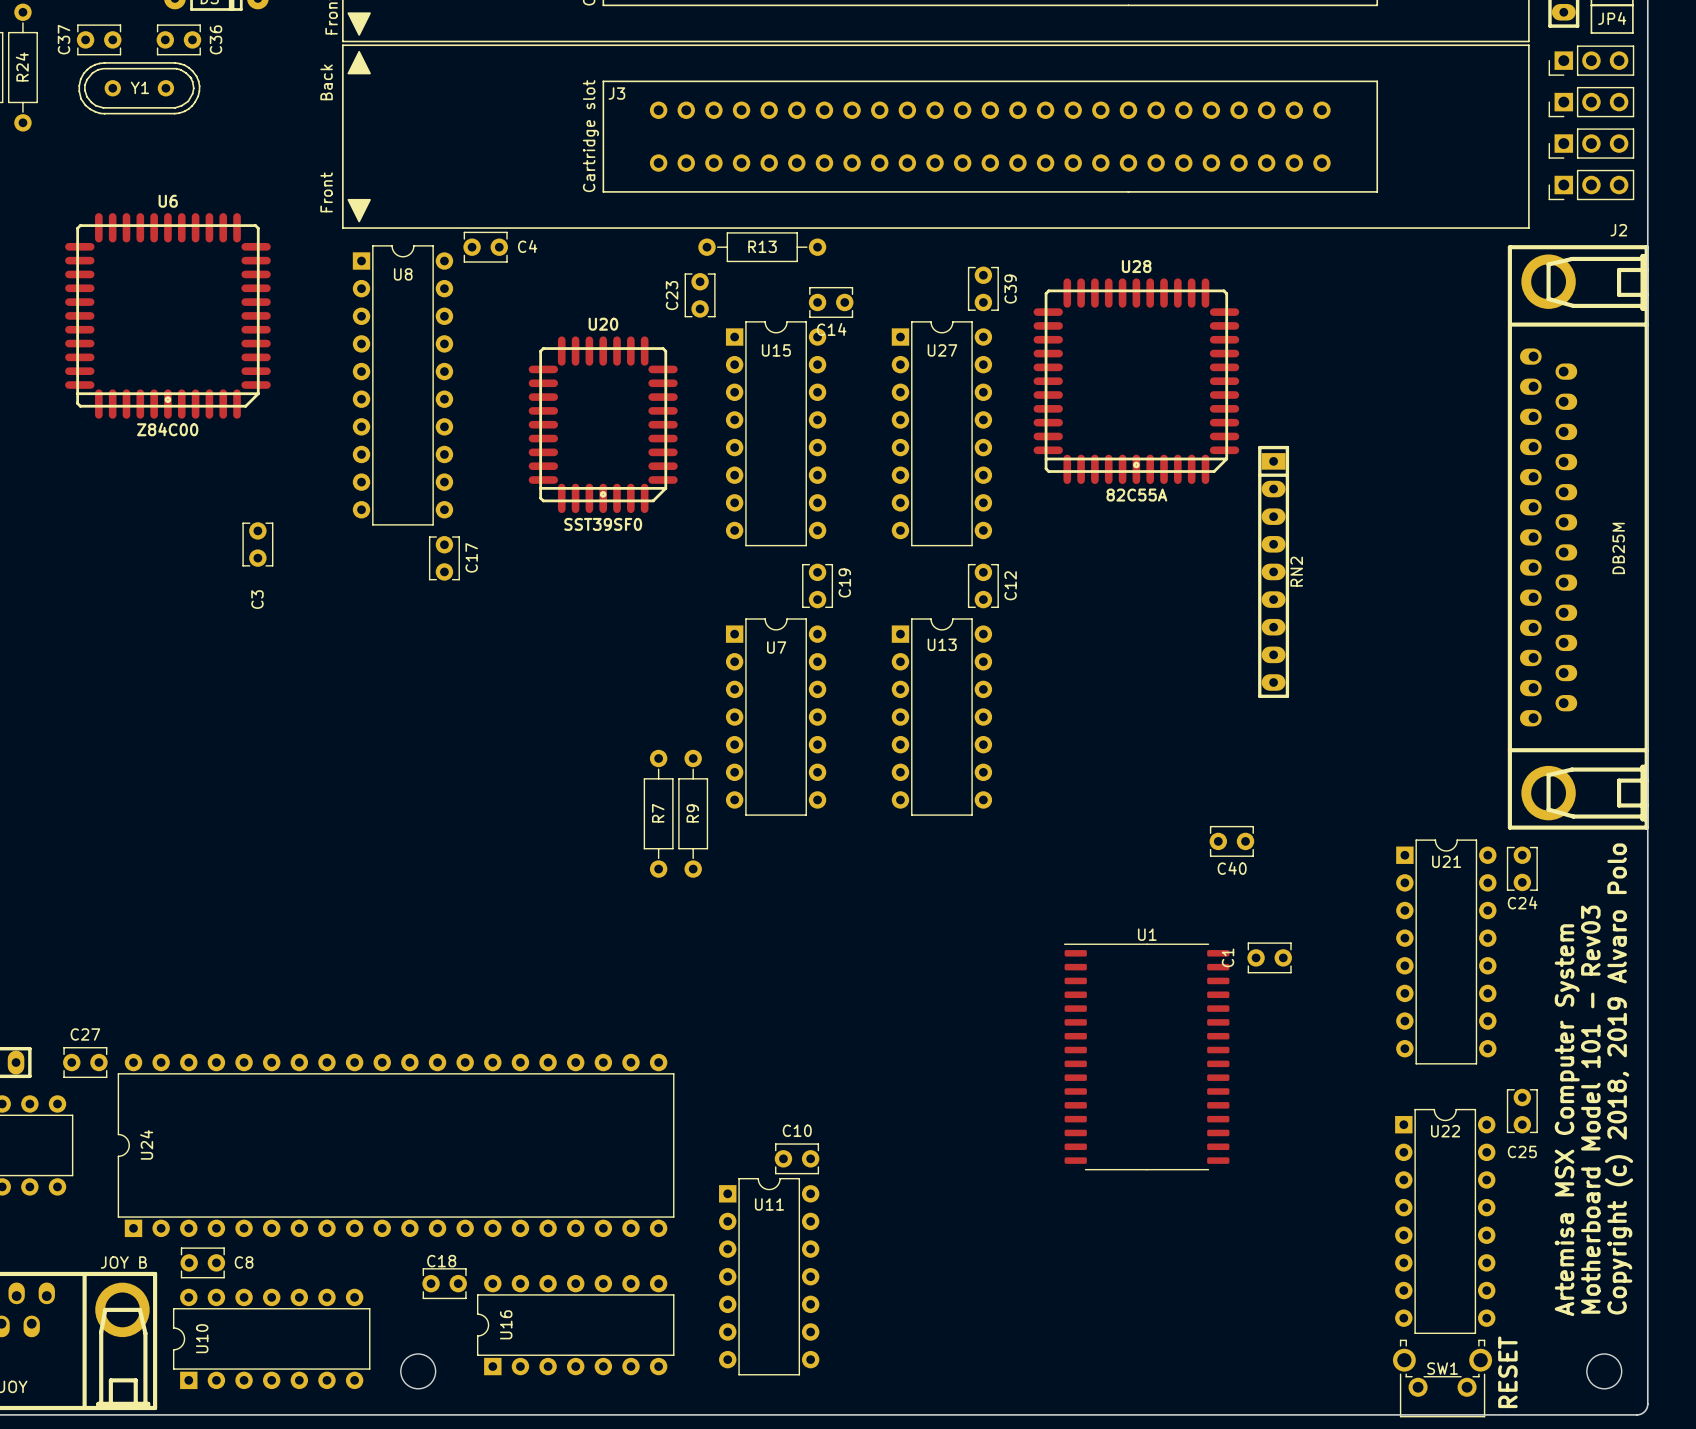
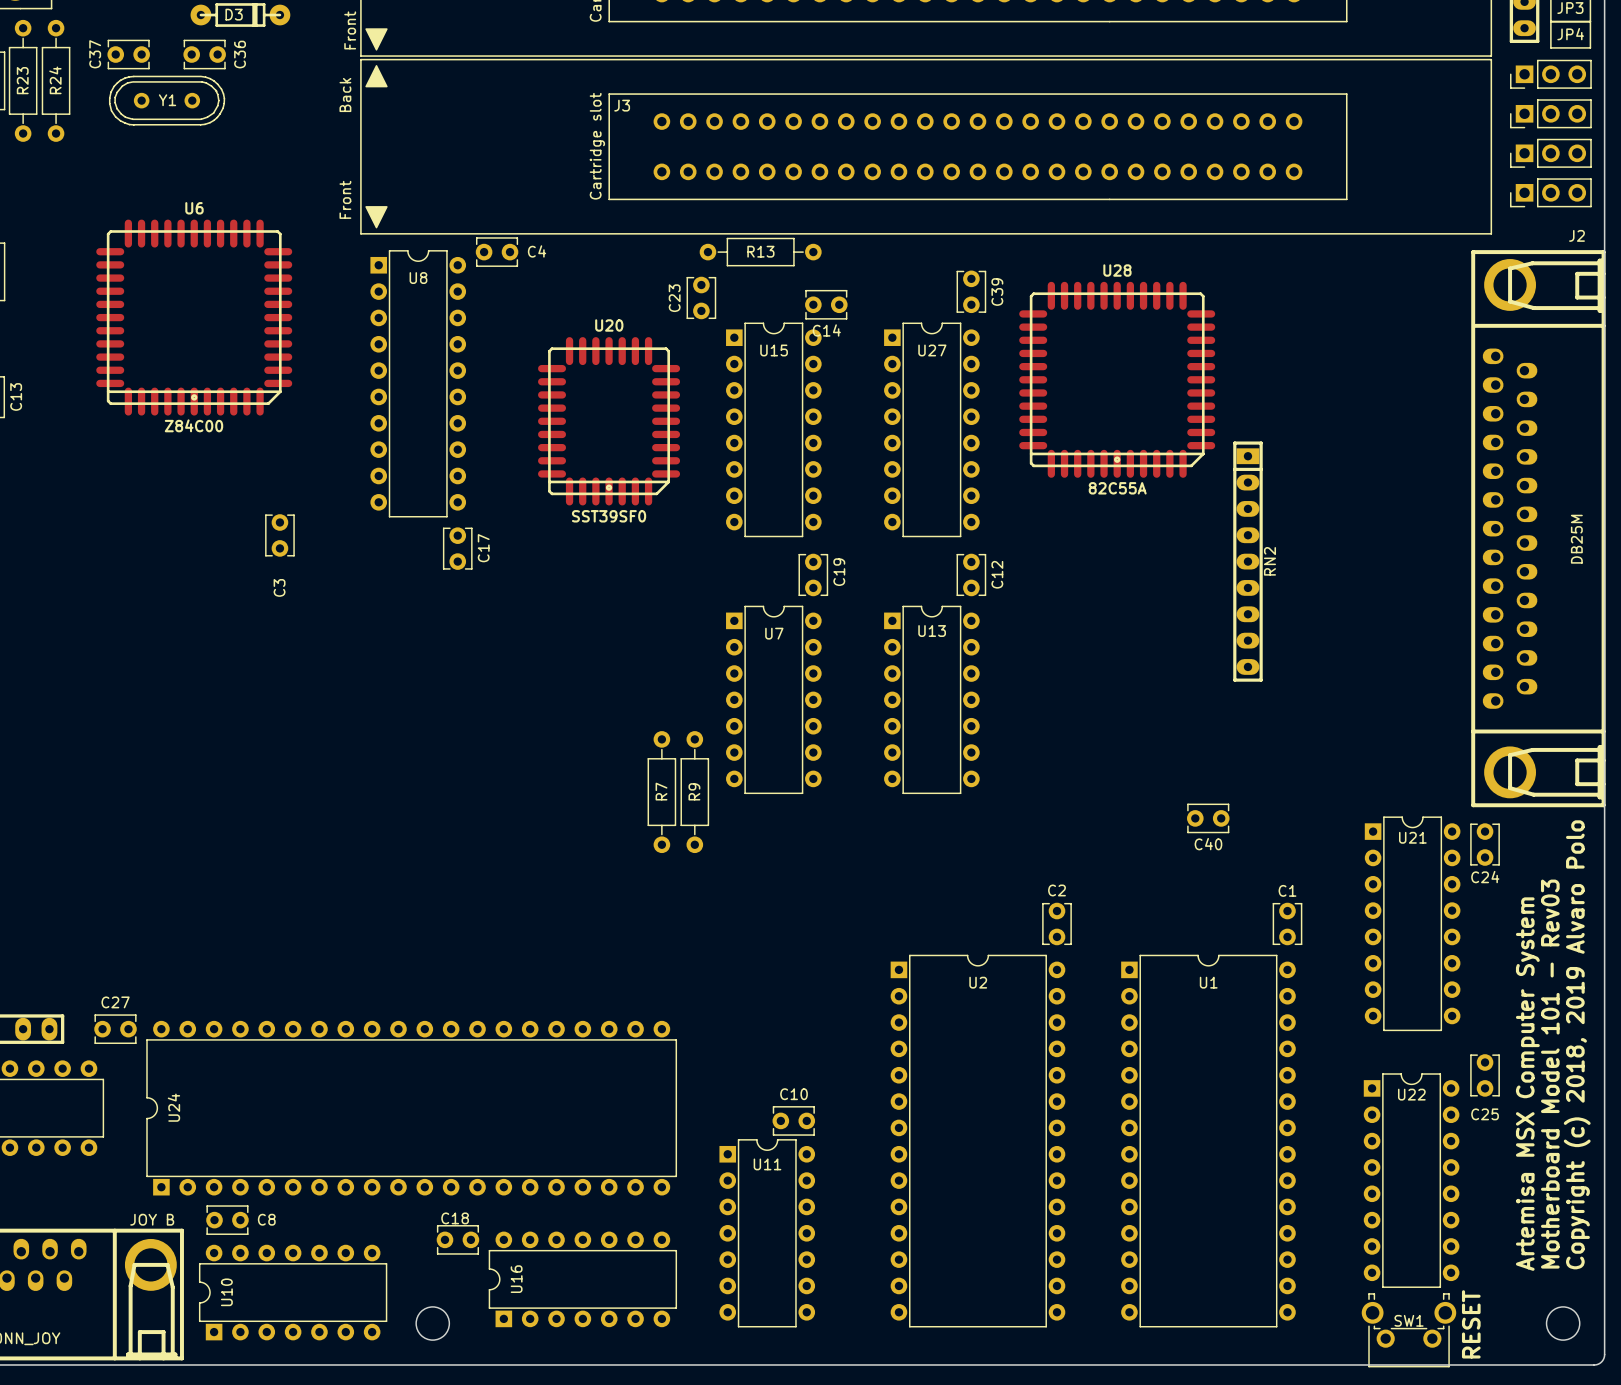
U1 name position: U1 (1147, 934) -> U1 (1208, 982)
U1 footprint: [1063, 943, 1230, 1171] -> [1121, 954, 1296, 1328]
C2: none -> (1057, 923)
C1 rotation: 0° (1269, 957) -> 90° clockwise (1287, 923)
C1 position: (1269, 957) -> (1287, 923)
U2: none -> (977, 1141)

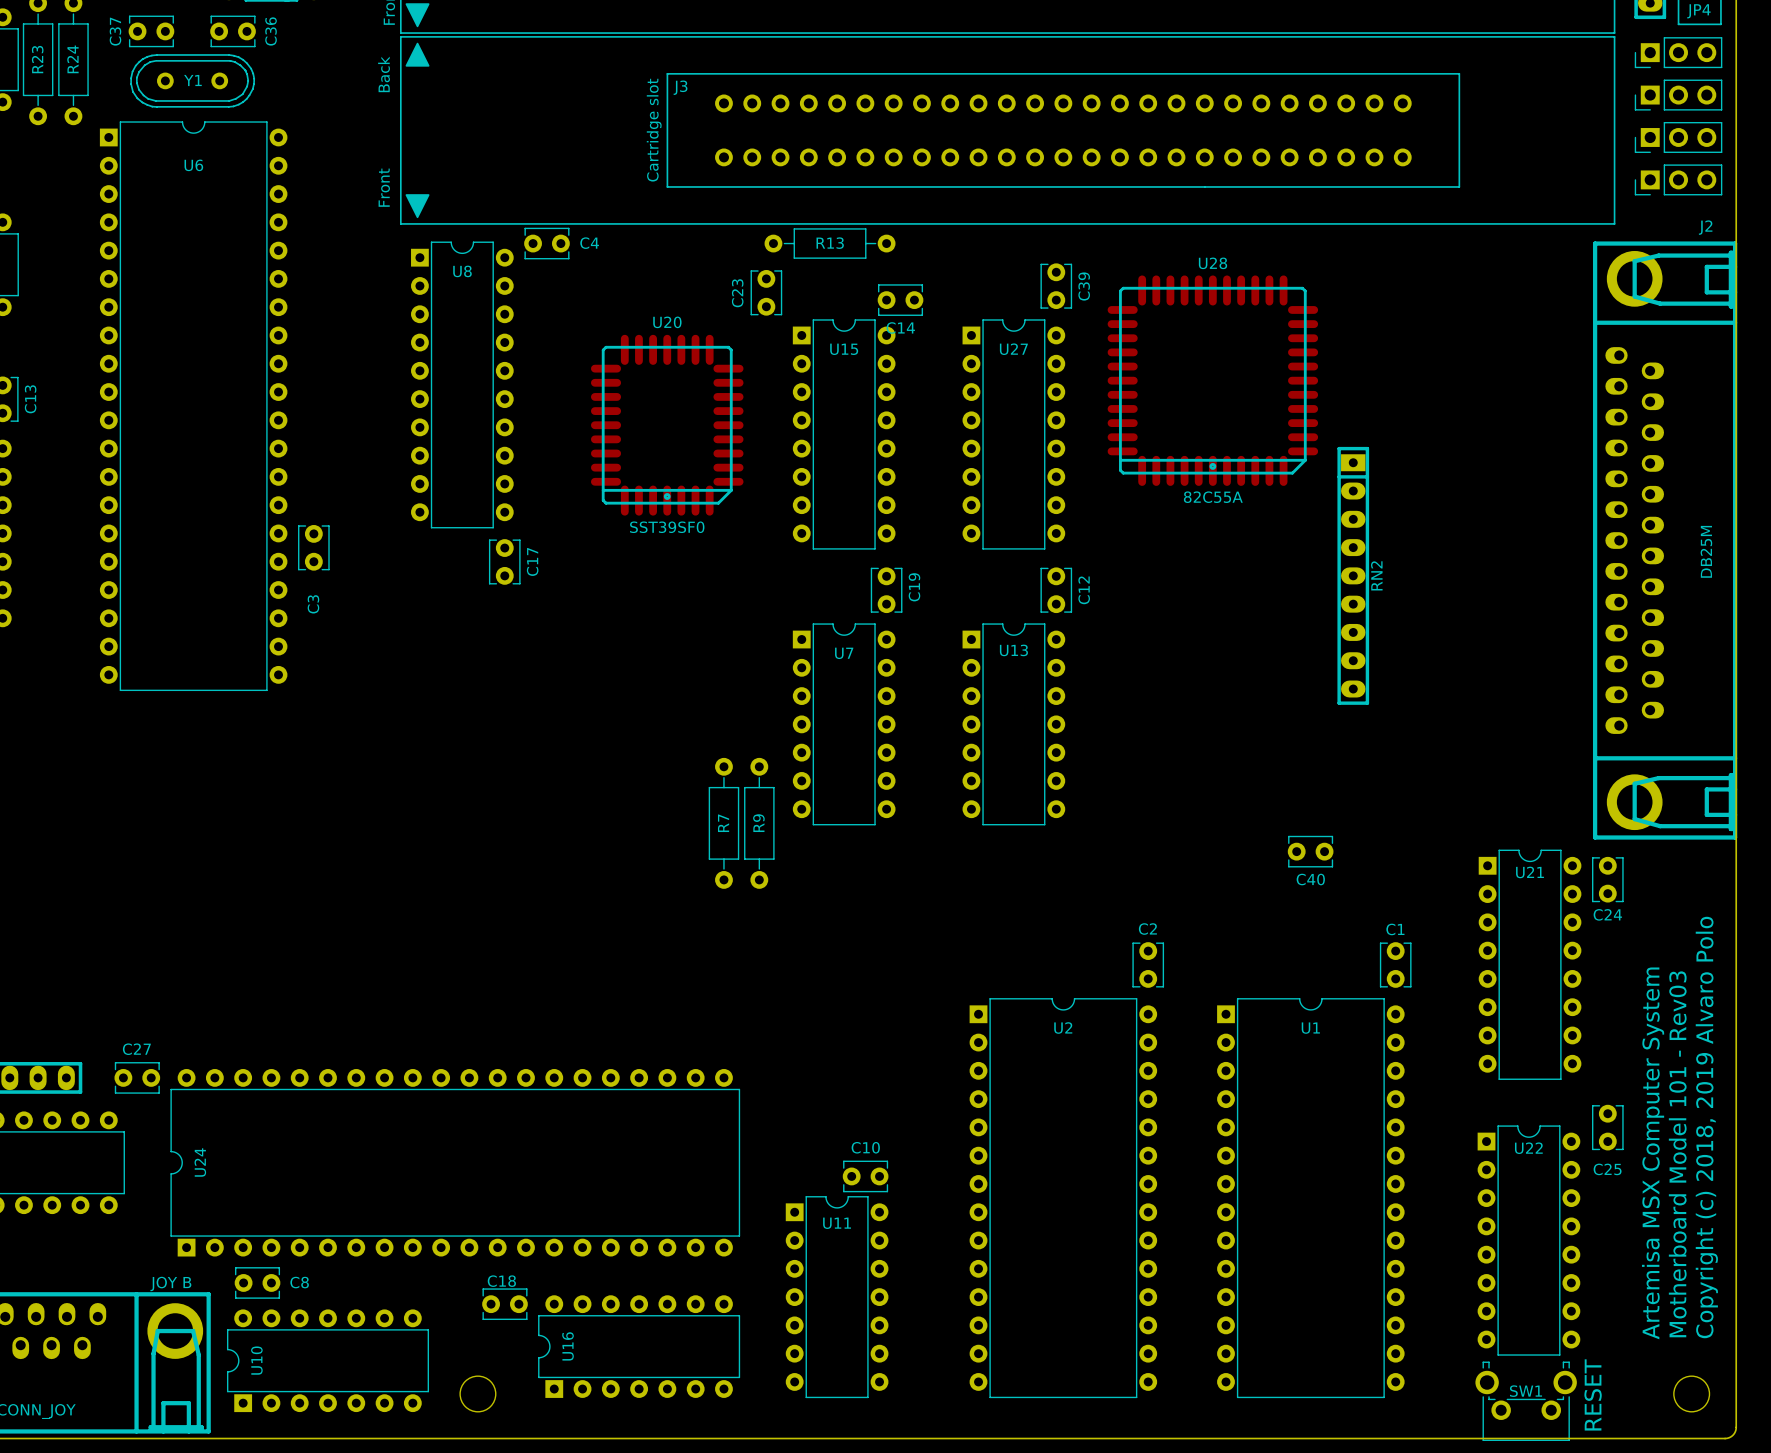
U6 name position: U6 (194, 208) -> U6 (193, 165)
U6 footprint: [96, 219, 293, 416] -> [99, 121, 288, 692]
U6 value: Z84C00 (193, 425) -> none

